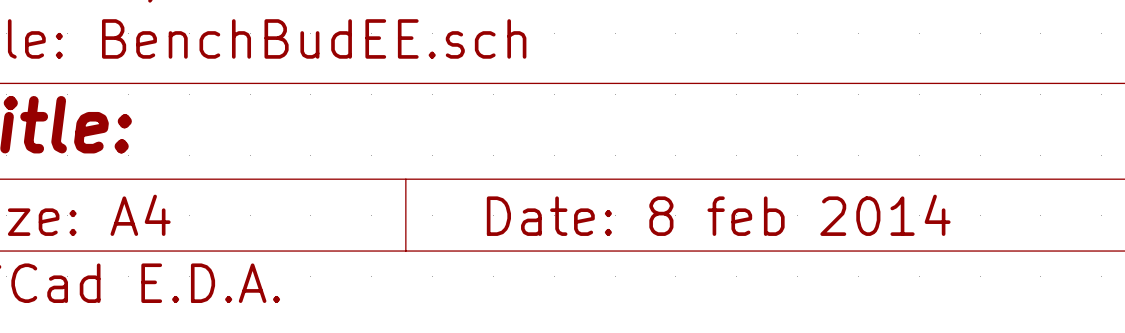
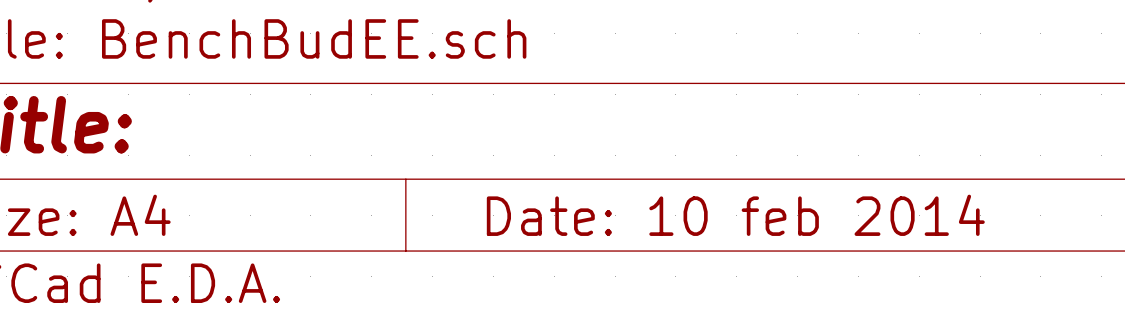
title block: Date: 8 feb 2014 (718, 215) -> Date: 10 feb 2014 (735, 215)

